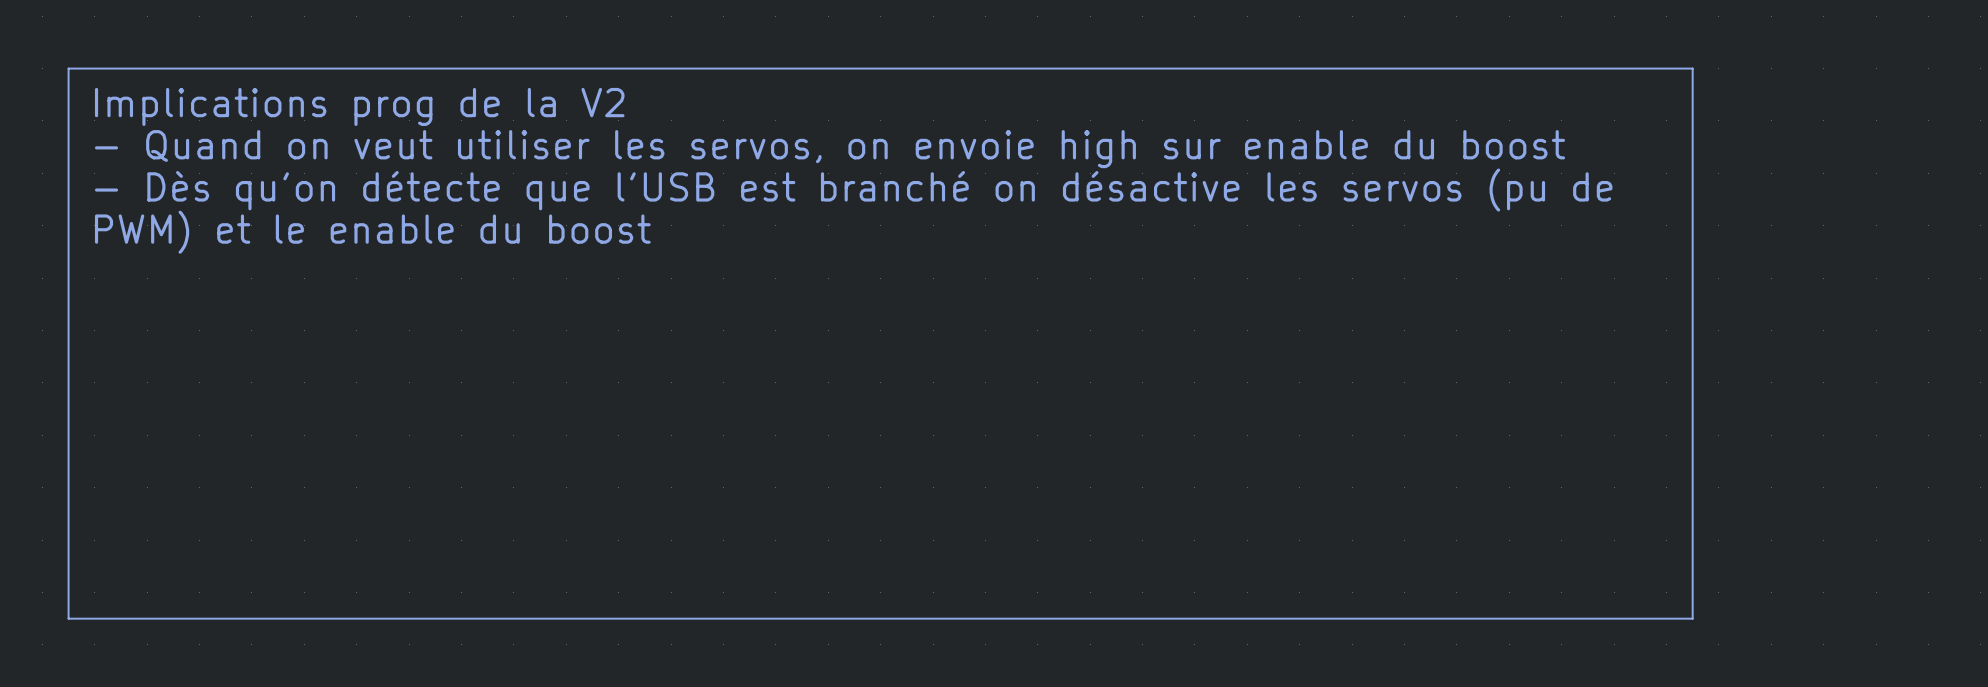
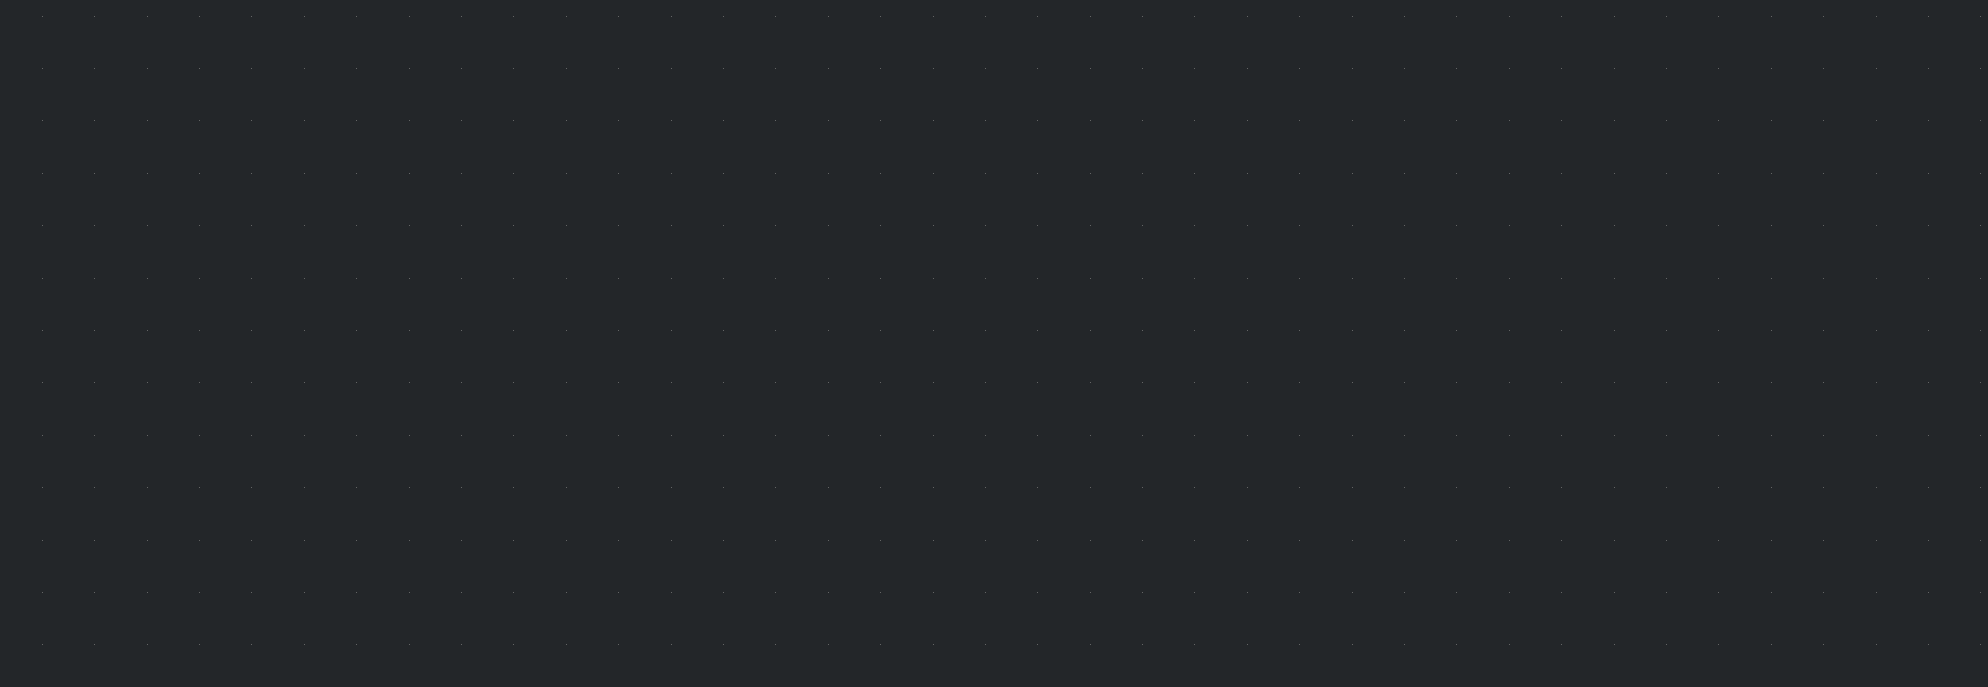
line: (68, 68) (1692, 68) (1692, 618) (68, 618) (68, 68) -> none
text: Implications prog de la V2 (359, 106) -> none
text: - Quand on veut utiliser les servos, on envoie high sur enable du boost (829, 149) -> none
text: - Dès qu'on détecte que l'USB est branché on désactive les servos (pu de (853, 190) -> none
text: PWM) et le enable du boost (372, 232) -> none

